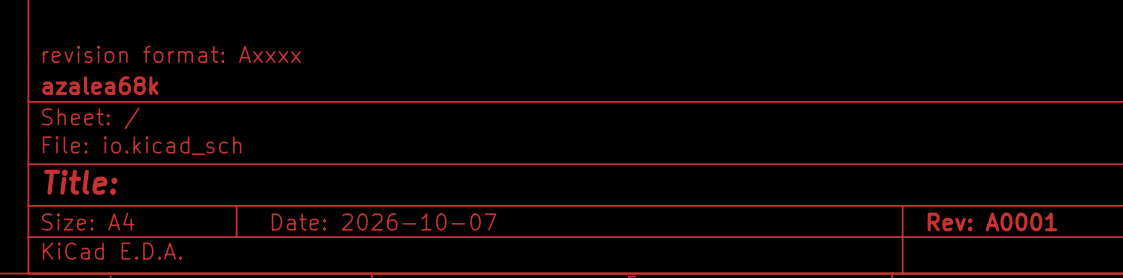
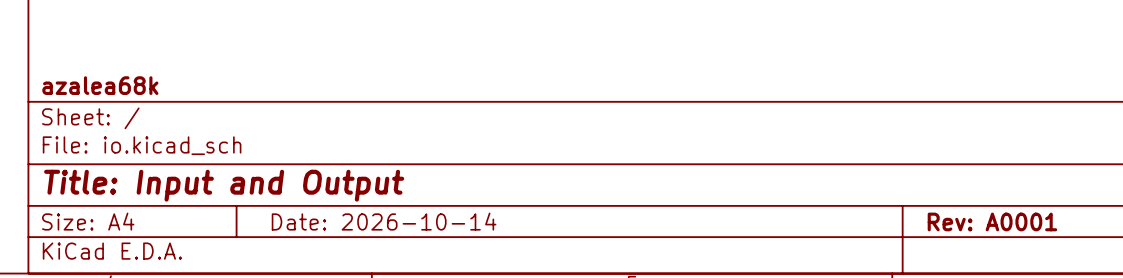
title block: revision format: Axxxx (171, 54) -> none
title block: Title: (80, 182) -> Title: Input and Output (224, 185)
title block: Date: 2026-10-07 (384, 221) -> Date: 2026-10-14 (384, 221)

